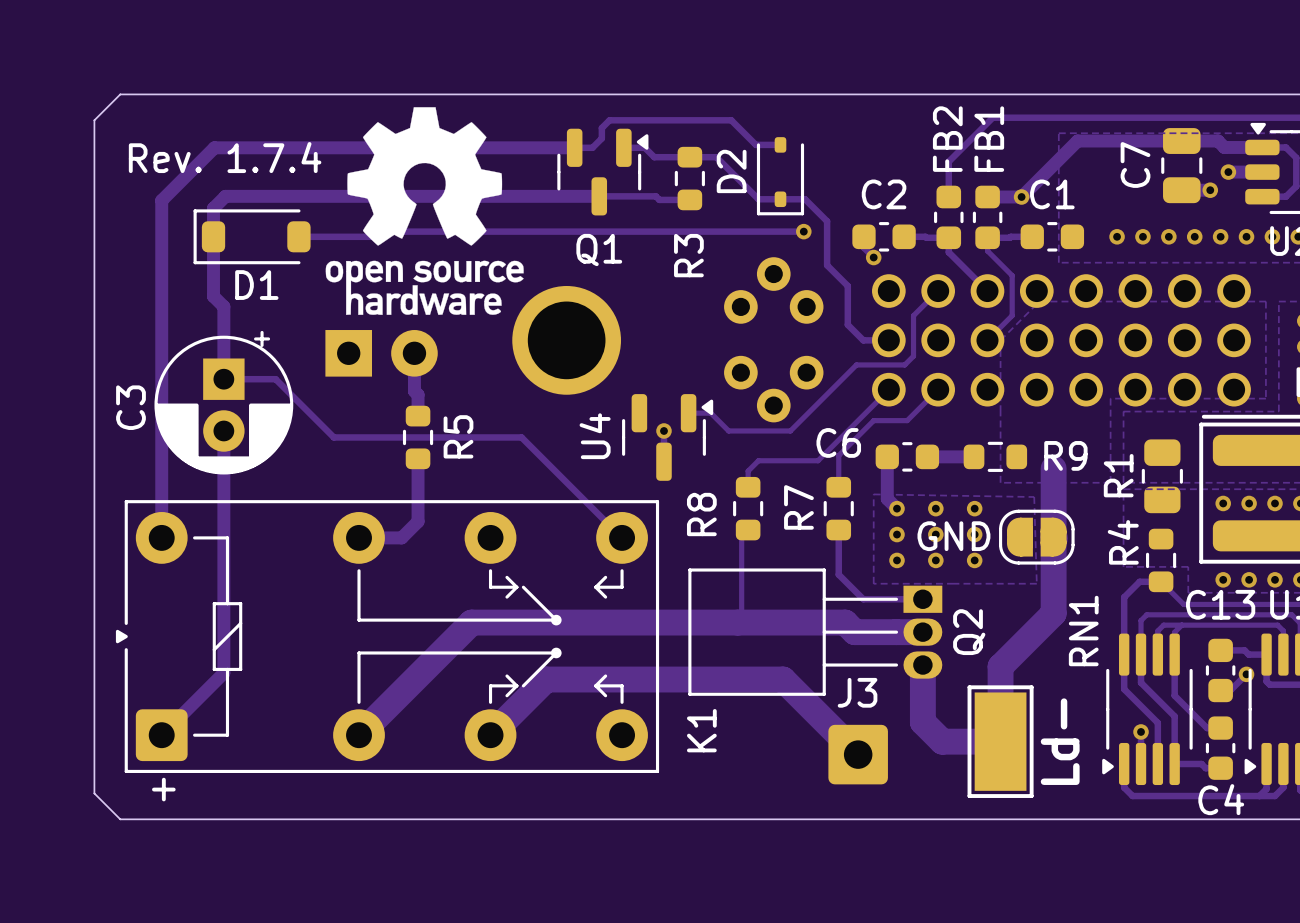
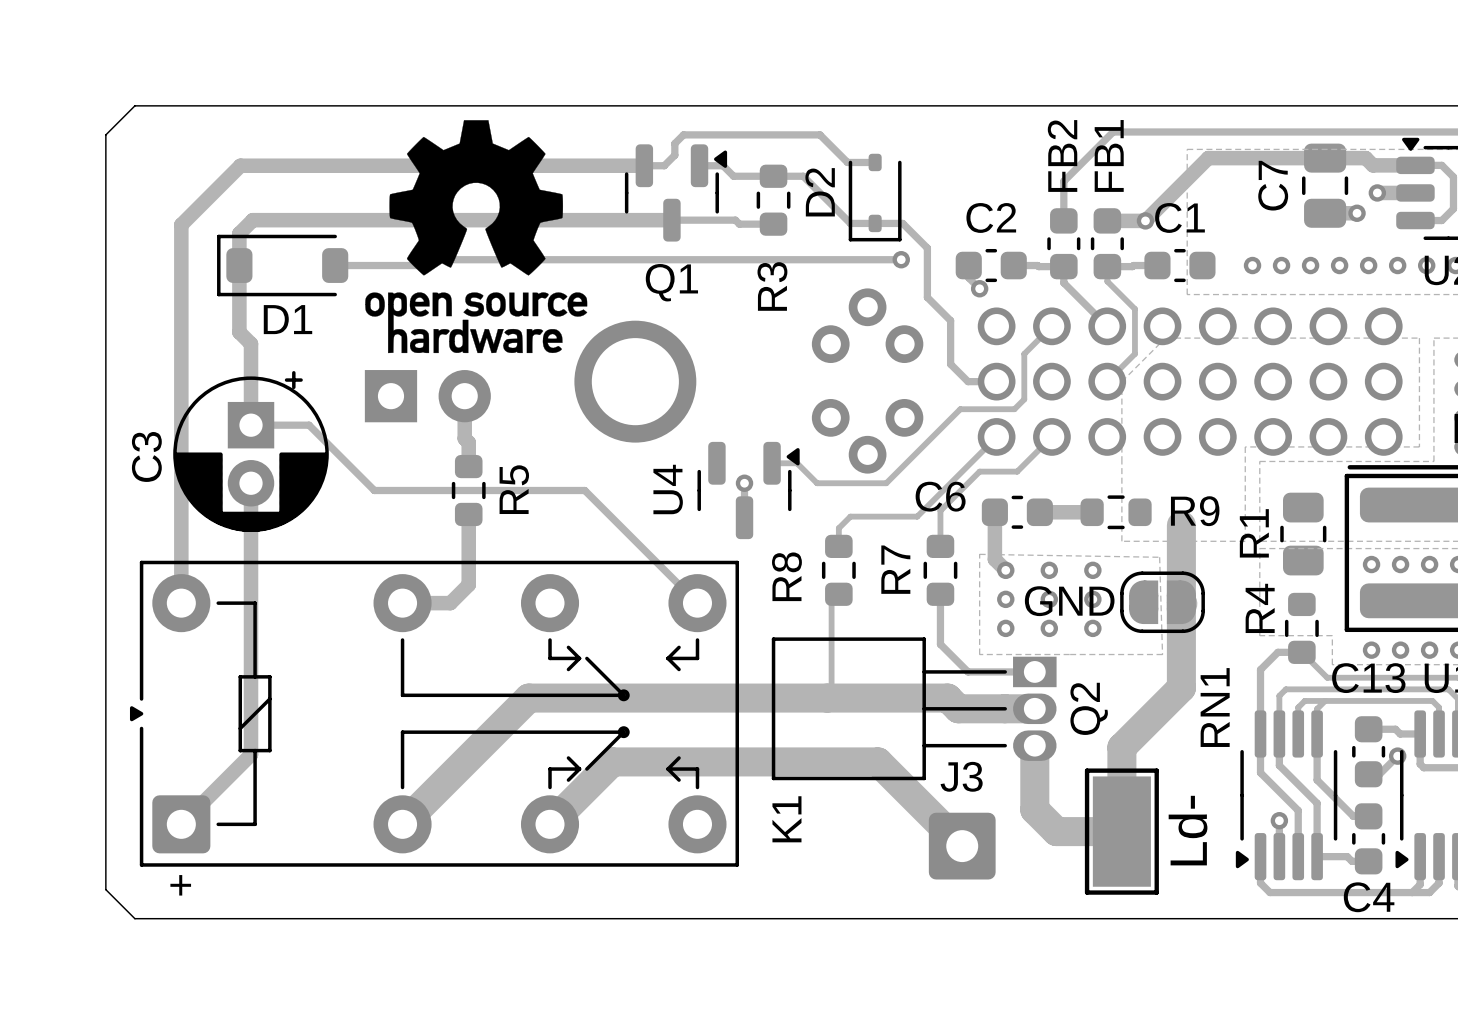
text: Rev. 1.7.4 (225, 157) -> none

